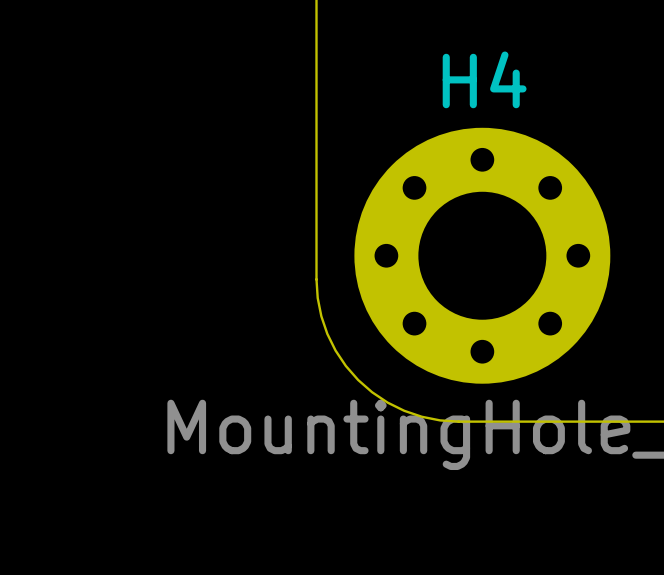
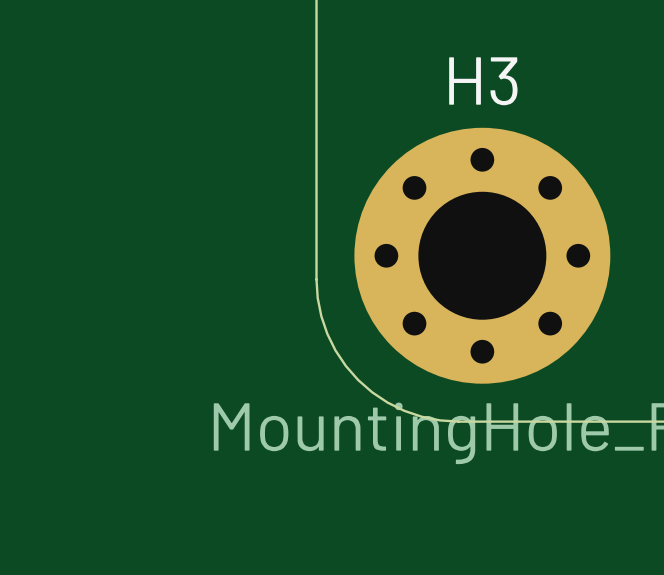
H4 name: H4 (484, 79) -> H3 (483, 81)

